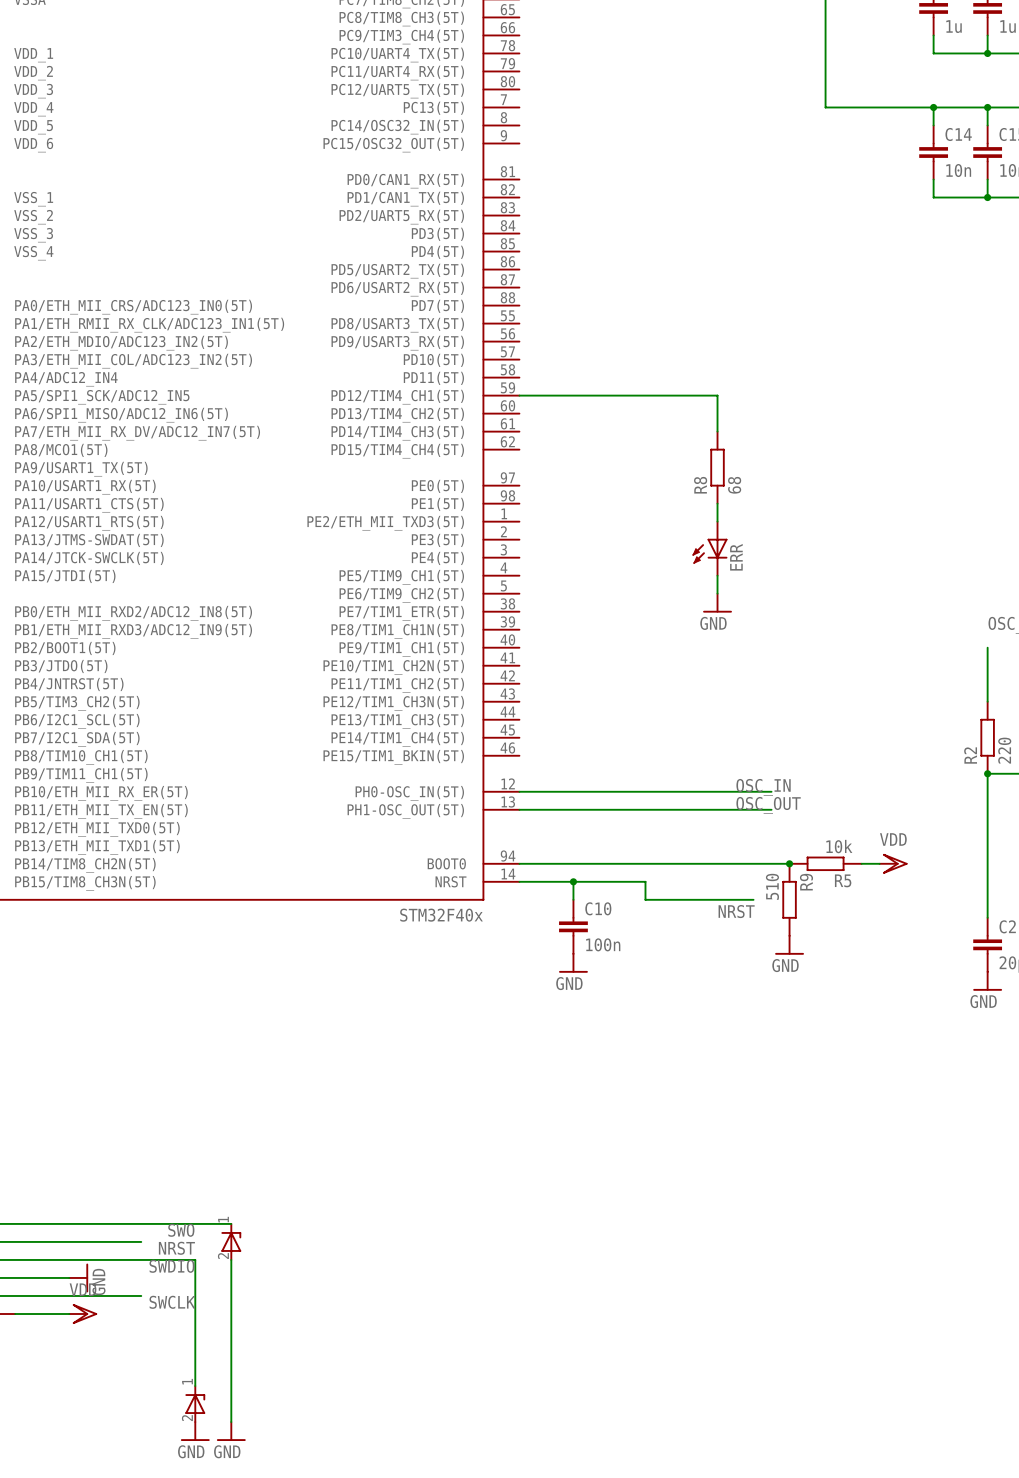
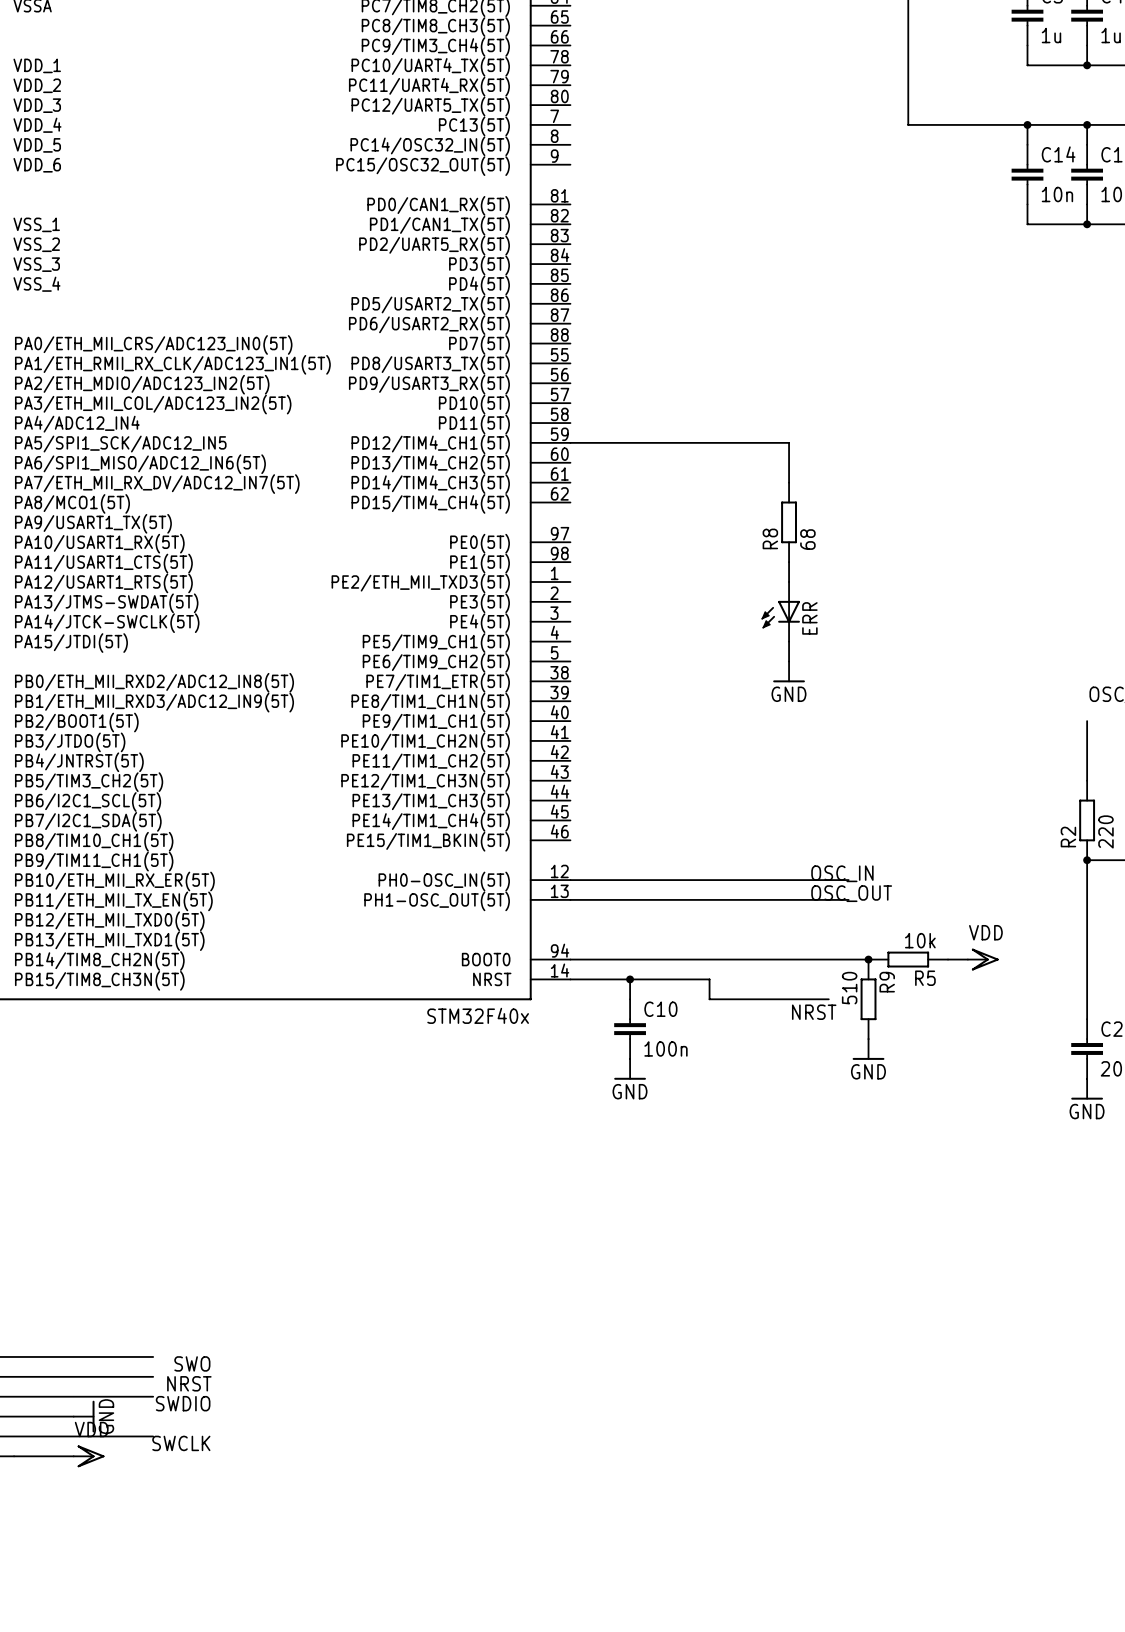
wire: (141, 1223) (231, 1223) -> none
part: (231, 1241) -> none
wire: (141, 1259) (195, 1259) (195, 1386) -> none
wire: (231, 1259) (231, 1422) -> none
part: (195, 1404) -> none
power symbol: GND (195, 1431) -> none
power symbol: GND (231, 1431) -> none

